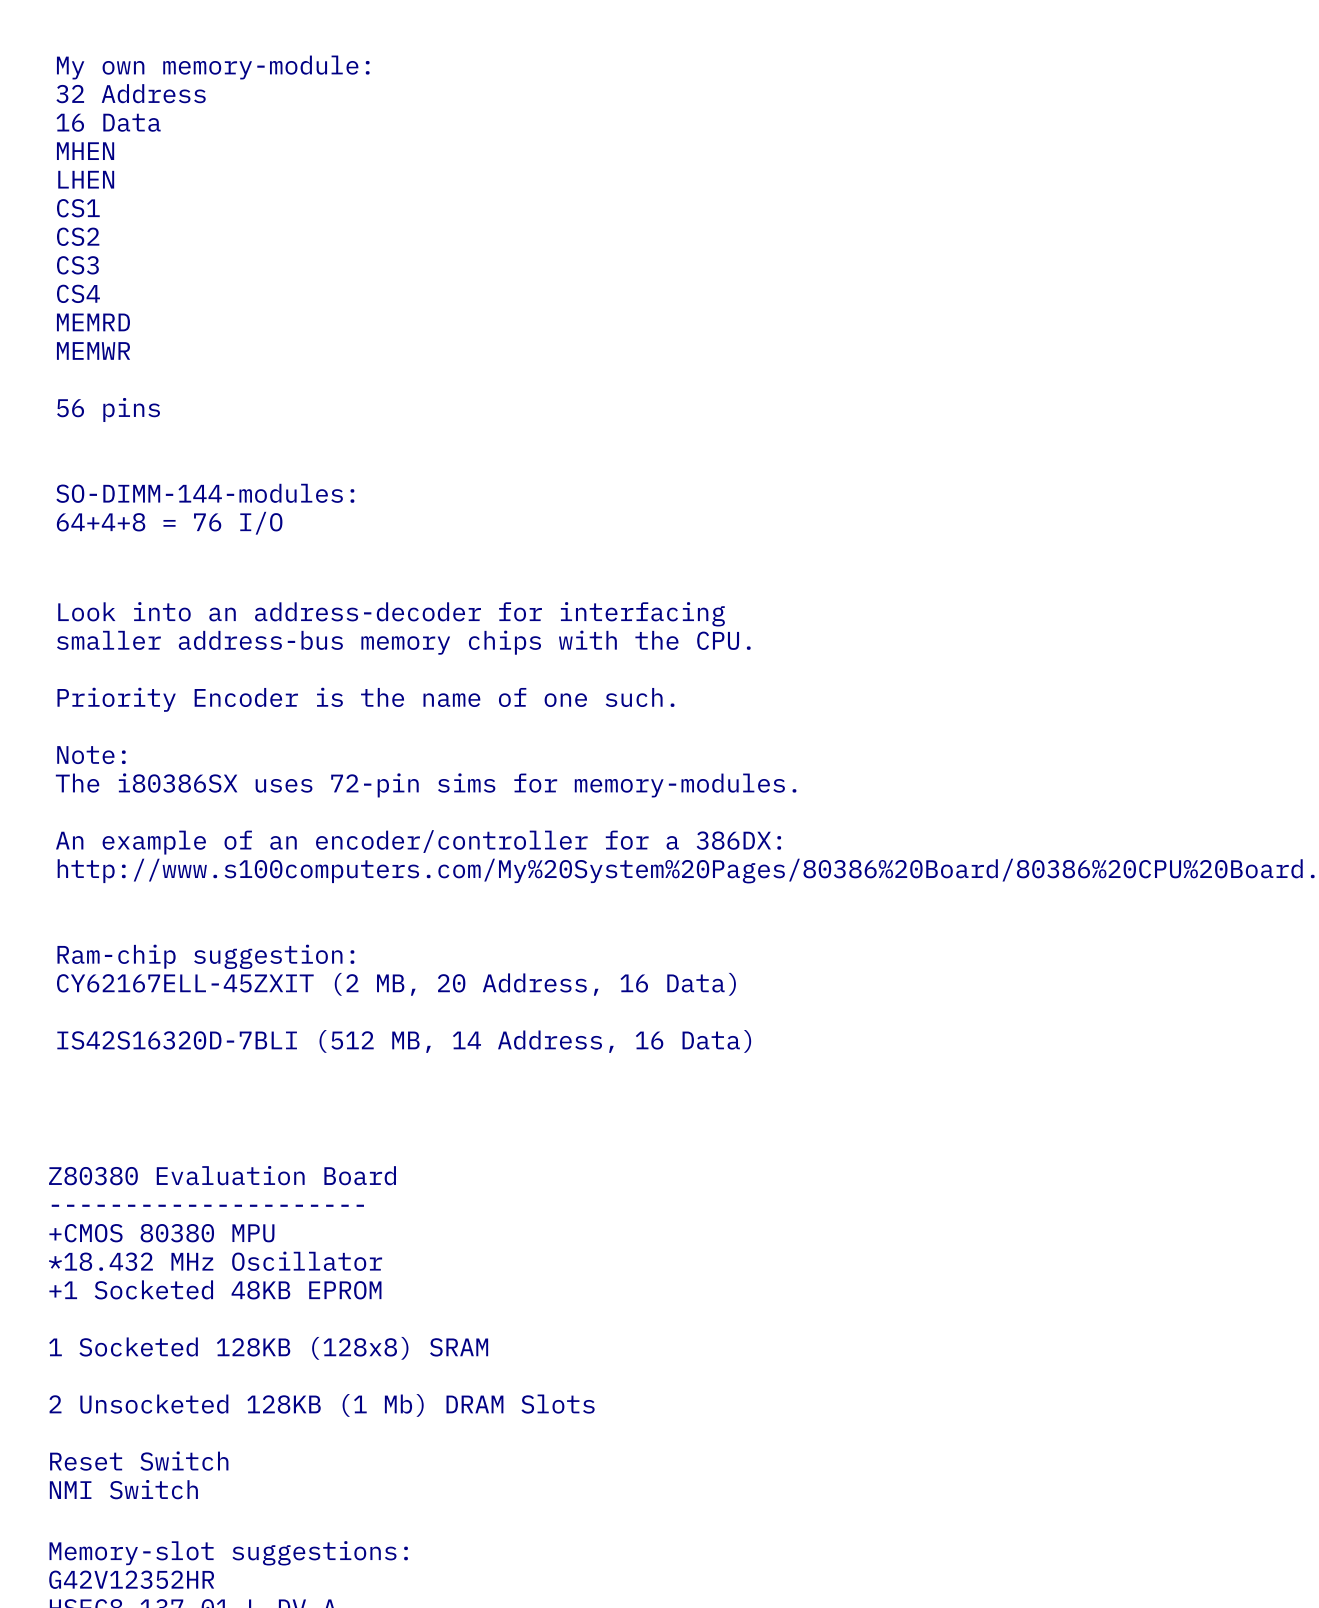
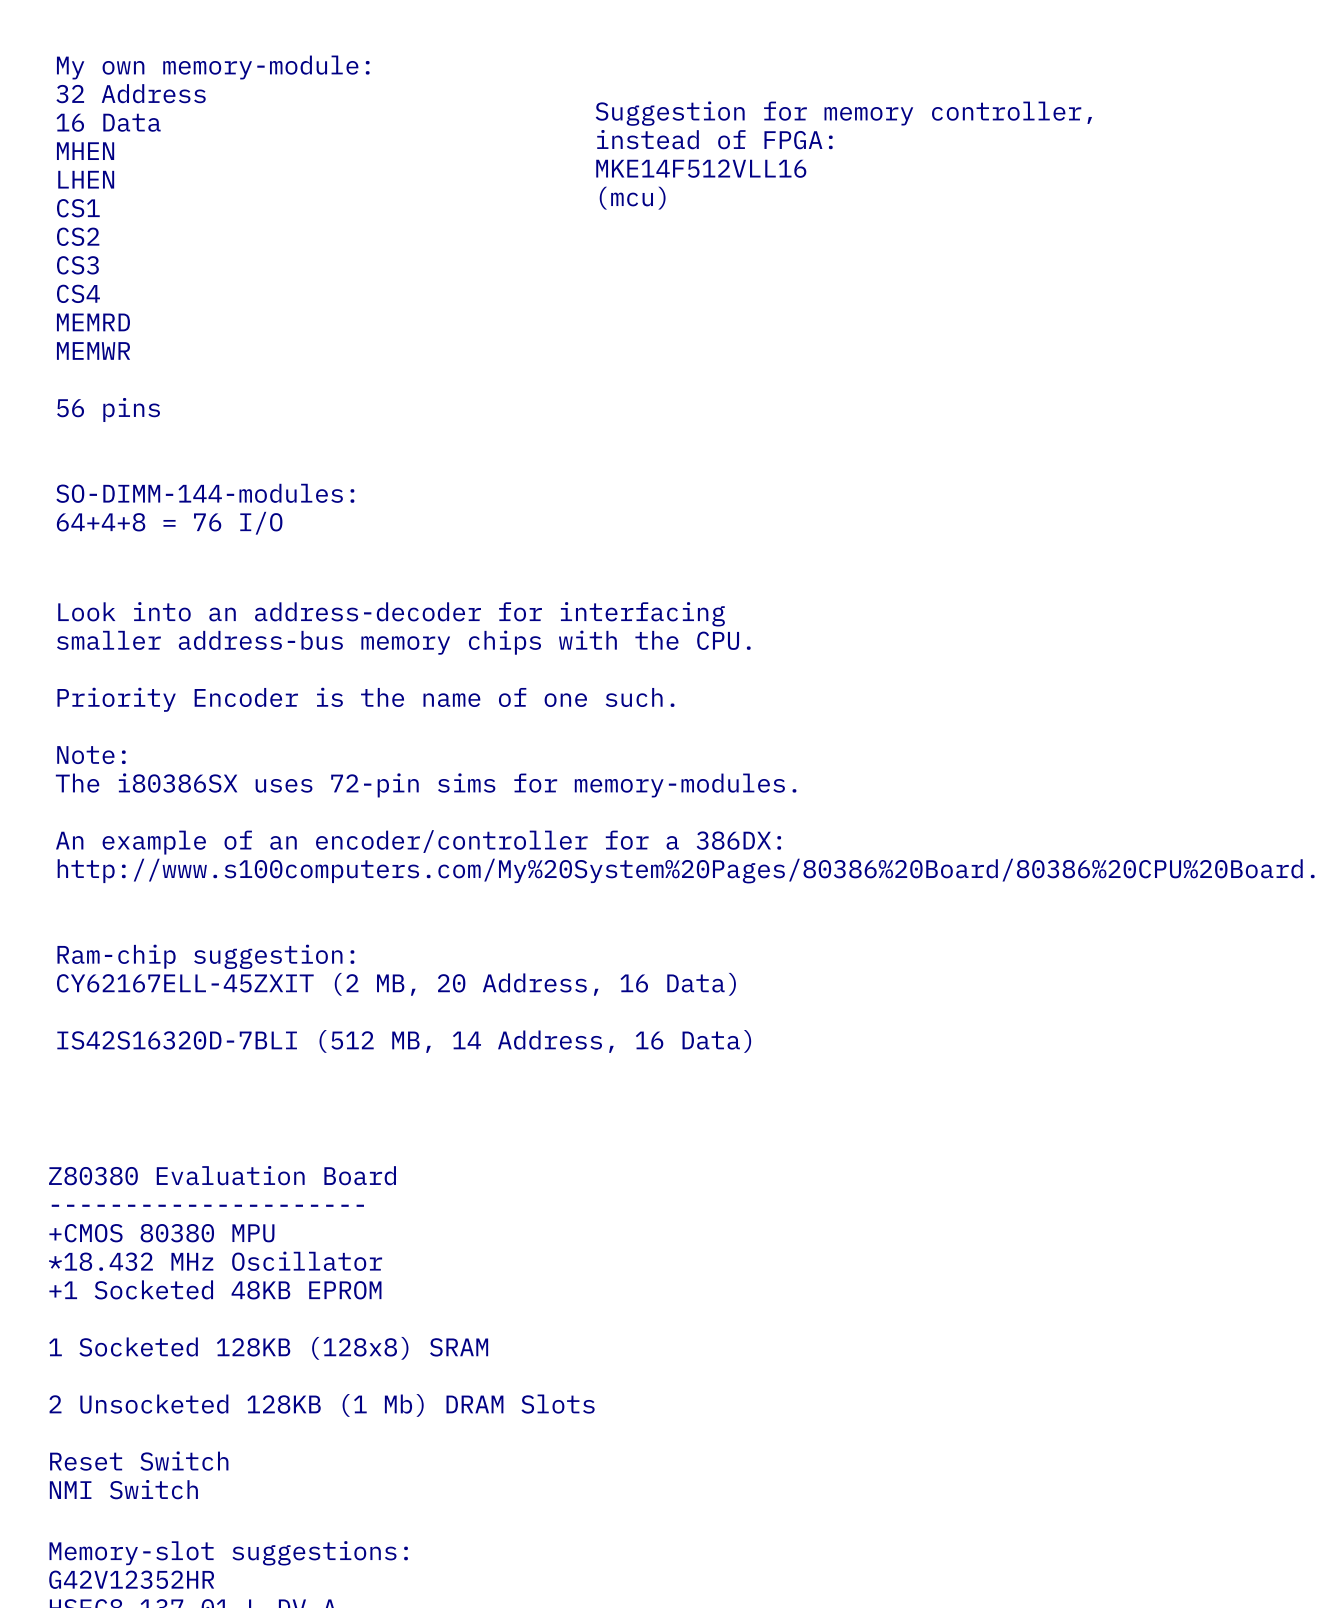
text: none -> Suggestion for memory controller, (843, 113)
text: none -> instead of FPGA: (714, 139)
text: none -> MKE14F512VLL16 (701, 168)
text: none -> (mcu) (632, 198)

